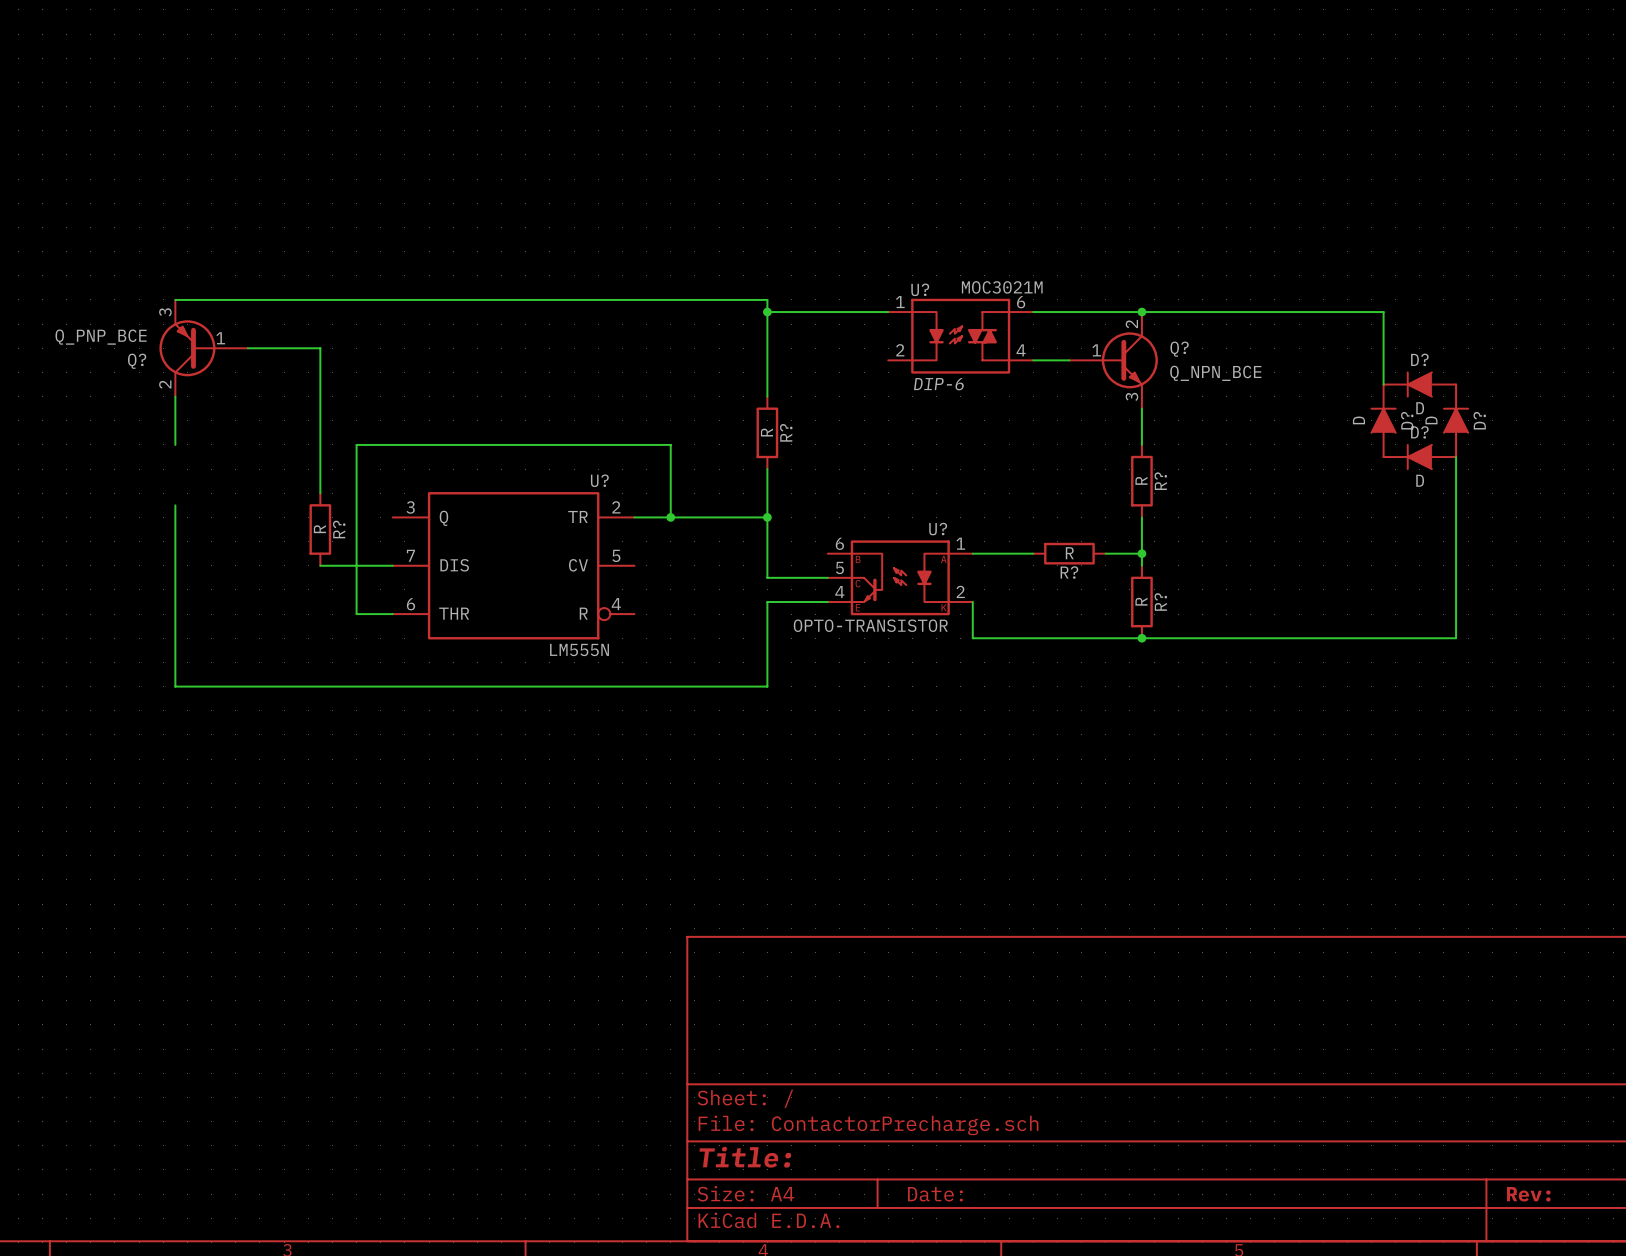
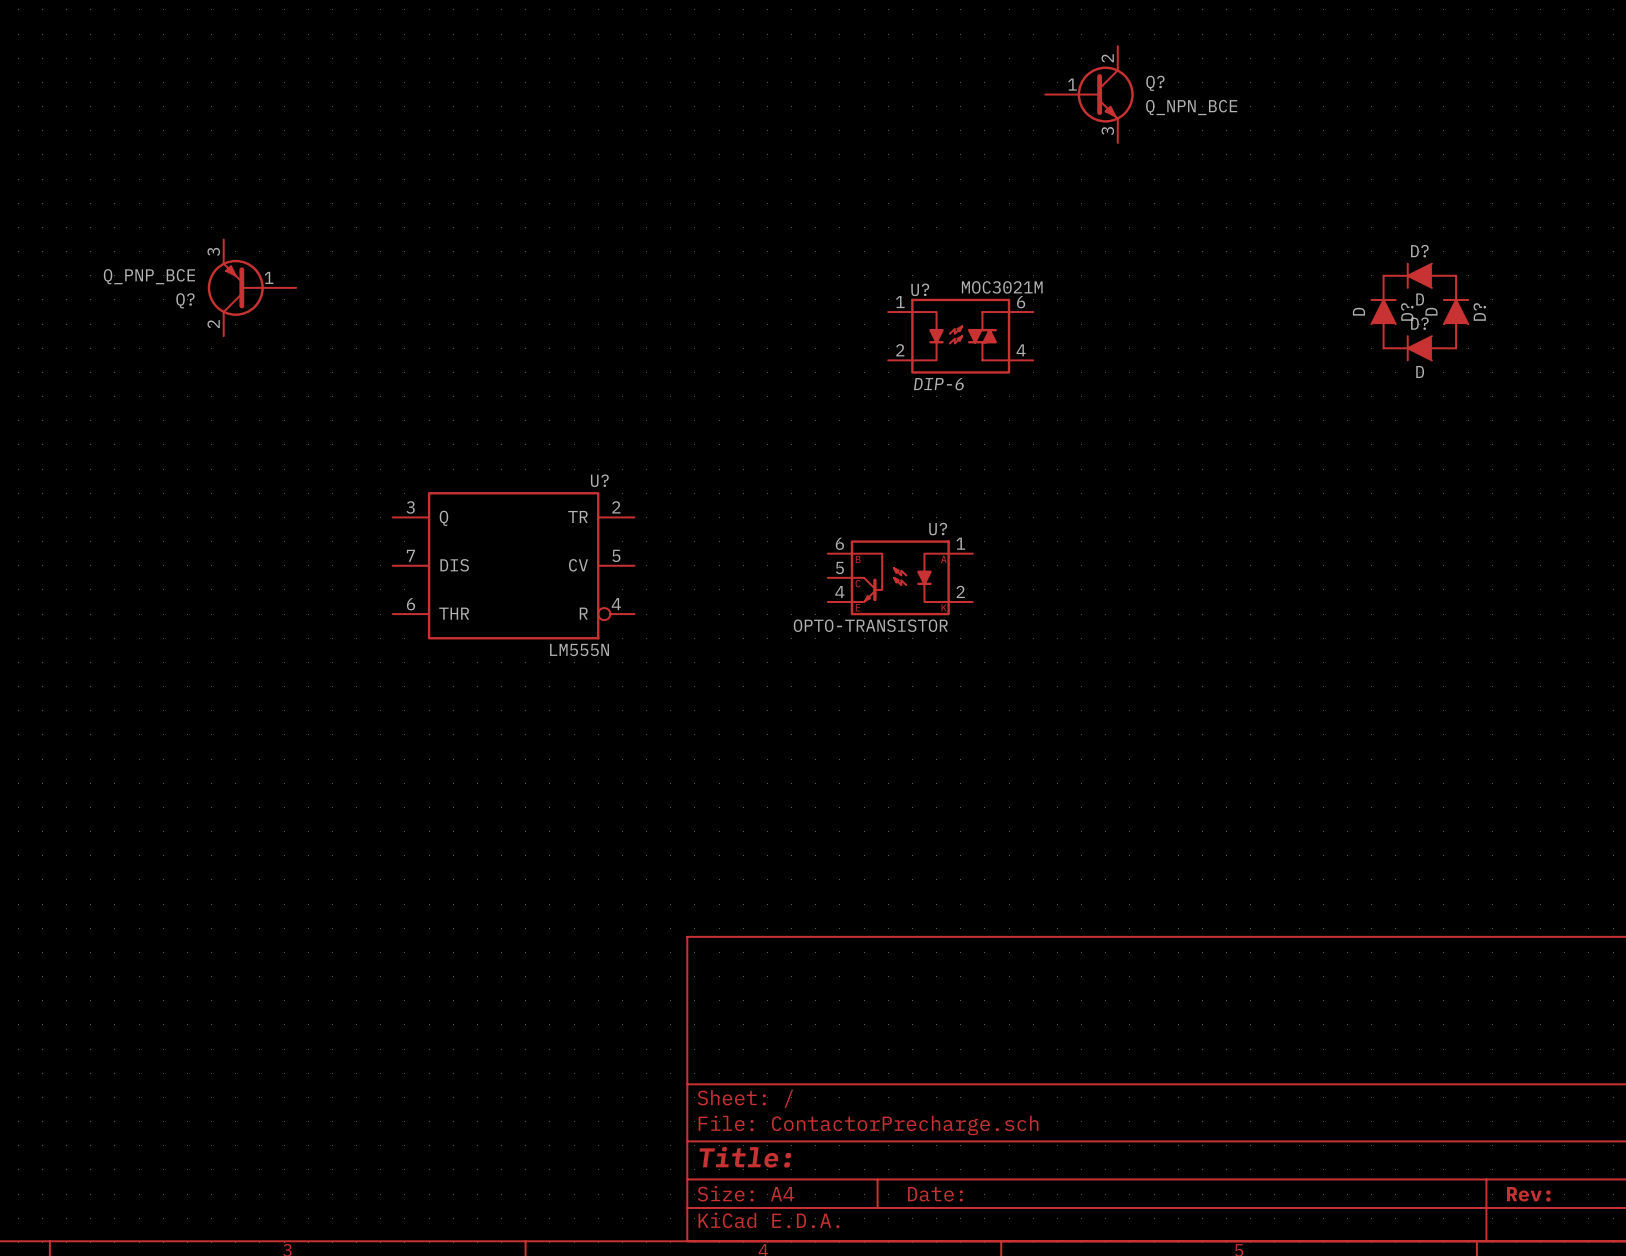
Q?: none -> Q_NPN_BCE (1089, 94)
D?: none -> D (1419, 275)
wire: (175, 299) (767, 299) (767, 396) -> none
wire: (767, 312) (888, 312) -> none
junction: (767, 312) -> none
wire: (1033, 312) (1383, 312) (1383, 384) -> none
junction: (1141, 312) -> none
D?: none -> D (1383, 312)
D?: none -> D (1456, 312)
Q? position: (203, 348) -> (251, 287)
wire: (247, 348) (320, 348) (320, 493) -> none
wire: (1033, 360) (1069, 360) -> none
Q?: Q_NPN_BCE (1113, 360) -> none
D? position: (1419, 384) -> (1419, 348)
wire: (175, 396) (175, 444) -> none
wire: (1141, 408) (1141, 444) -> none
D?: D (1383, 420) -> none
D?: D (1456, 420) -> none
R?: R (767, 432) -> none
D?: D (1419, 457) -> none
wire: (1456, 457) (1456, 638) (972, 638) (972, 602) -> none
wire: (767, 469) (767, 577) (827, 577) -> none
R?: R (1141, 481) -> none
wire: (175, 505) (175, 686) (767, 686) (767, 602) (827, 602) -> none
wire: (634, 517) (767, 517) -> none
wire: (670, 517) (670, 444) (356, 444) (356, 614) (392, 614) -> none
junction: (670, 517) -> none
junction: (767, 517) -> none
wire: (1141, 517) (1141, 565) -> none
R?: R (320, 529) -> none
wire: (972, 553) (1033, 553) -> none
R?: R (1069, 553) -> none
wire: (1105, 553) (1141, 553) -> none
junction: (1141, 553) -> none
wire: (320, 565) (392, 565) -> none
R?: R (1141, 602) -> none
junction: (1141, 638) -> none

